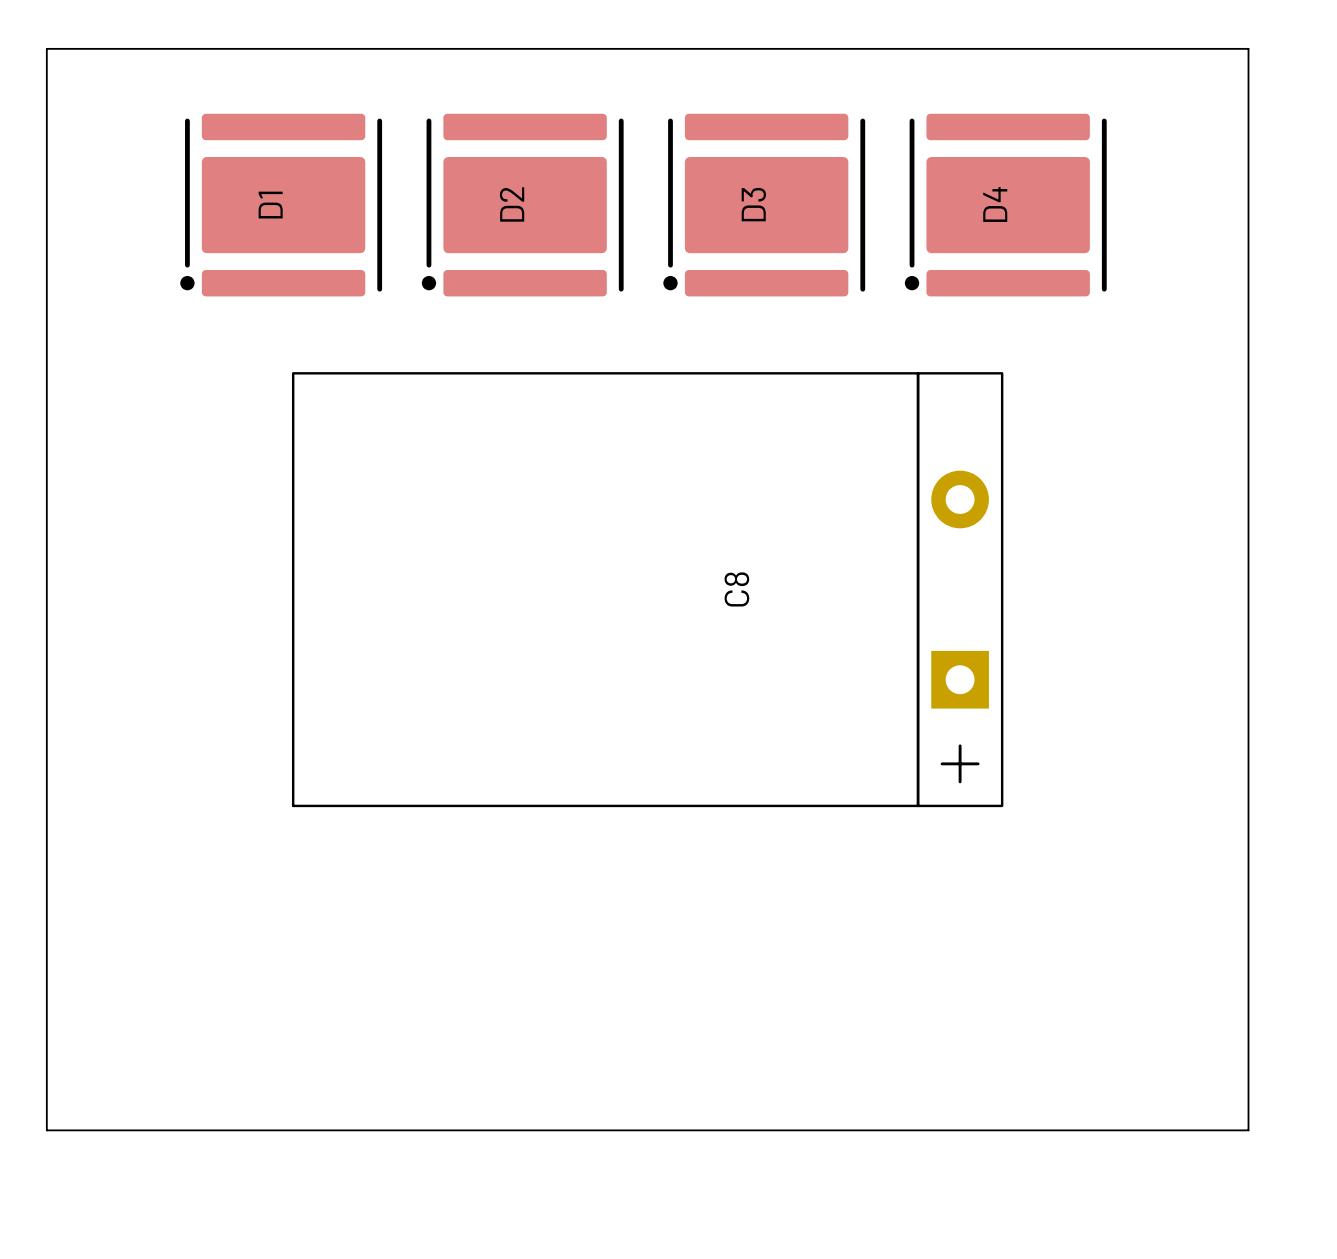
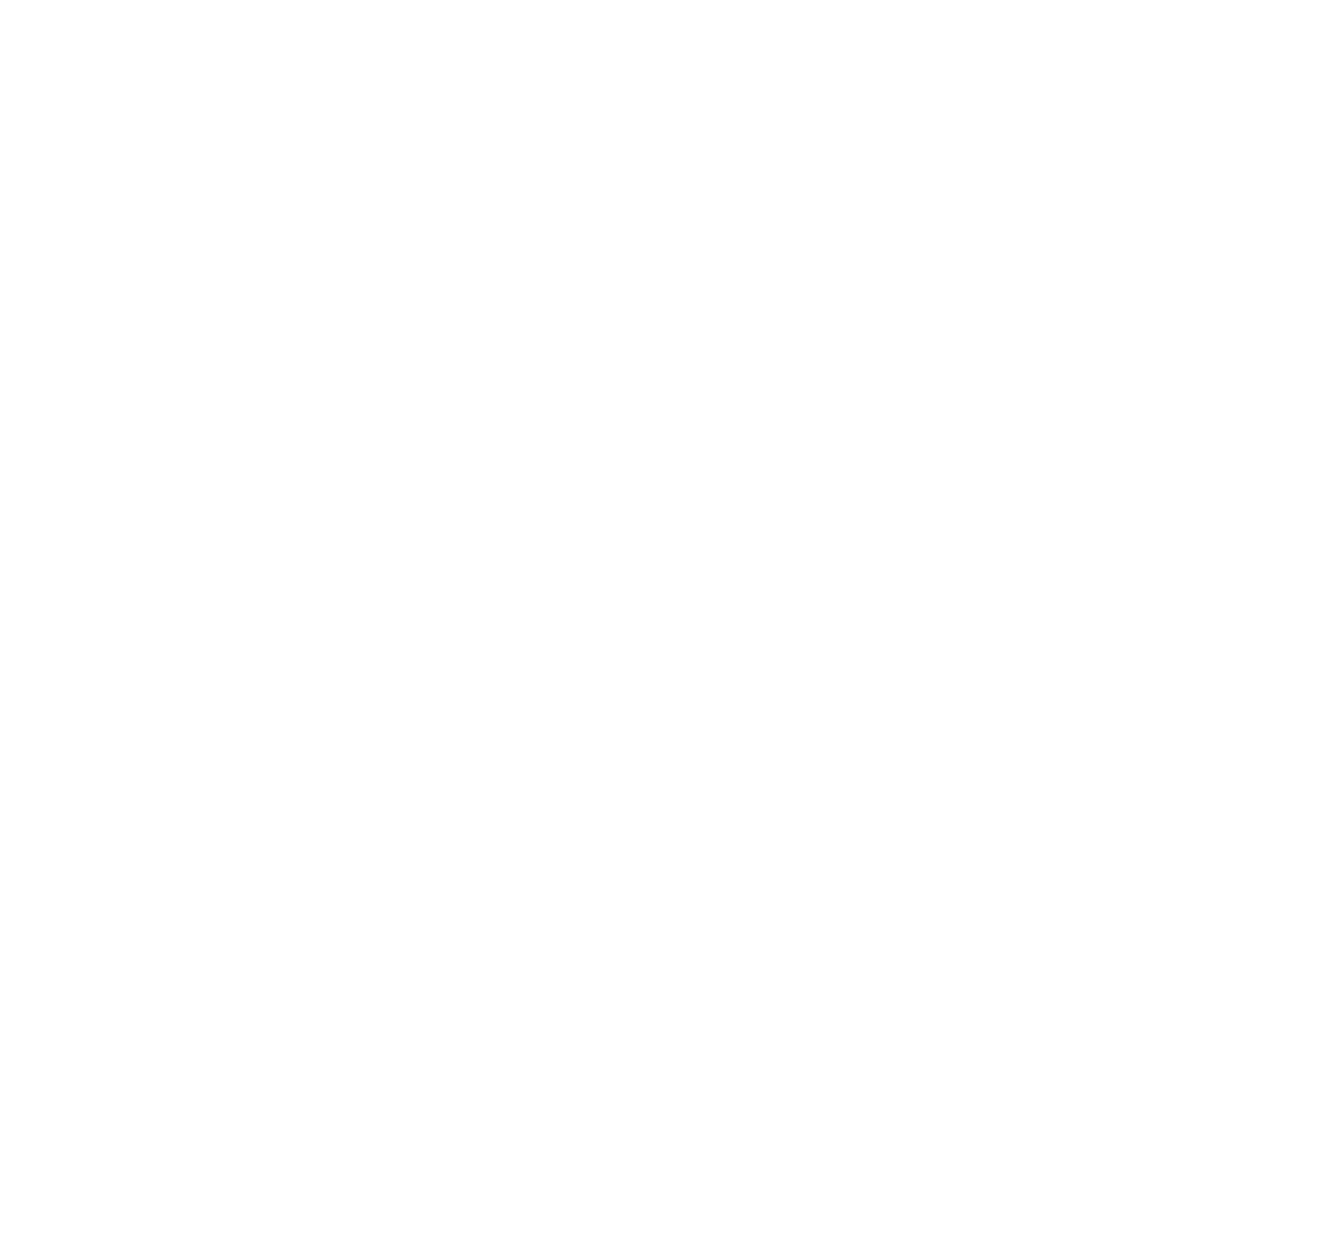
board edge: (46, 48) (1248, 48) (1248, 1130) (46, 1130) (46, 48) -> none
D1: (281, 205) -> none
D2: (522, 205) -> none
D3: (764, 205) -> none
D4: (1005, 205) -> none
C8: (647, 589) -> none

